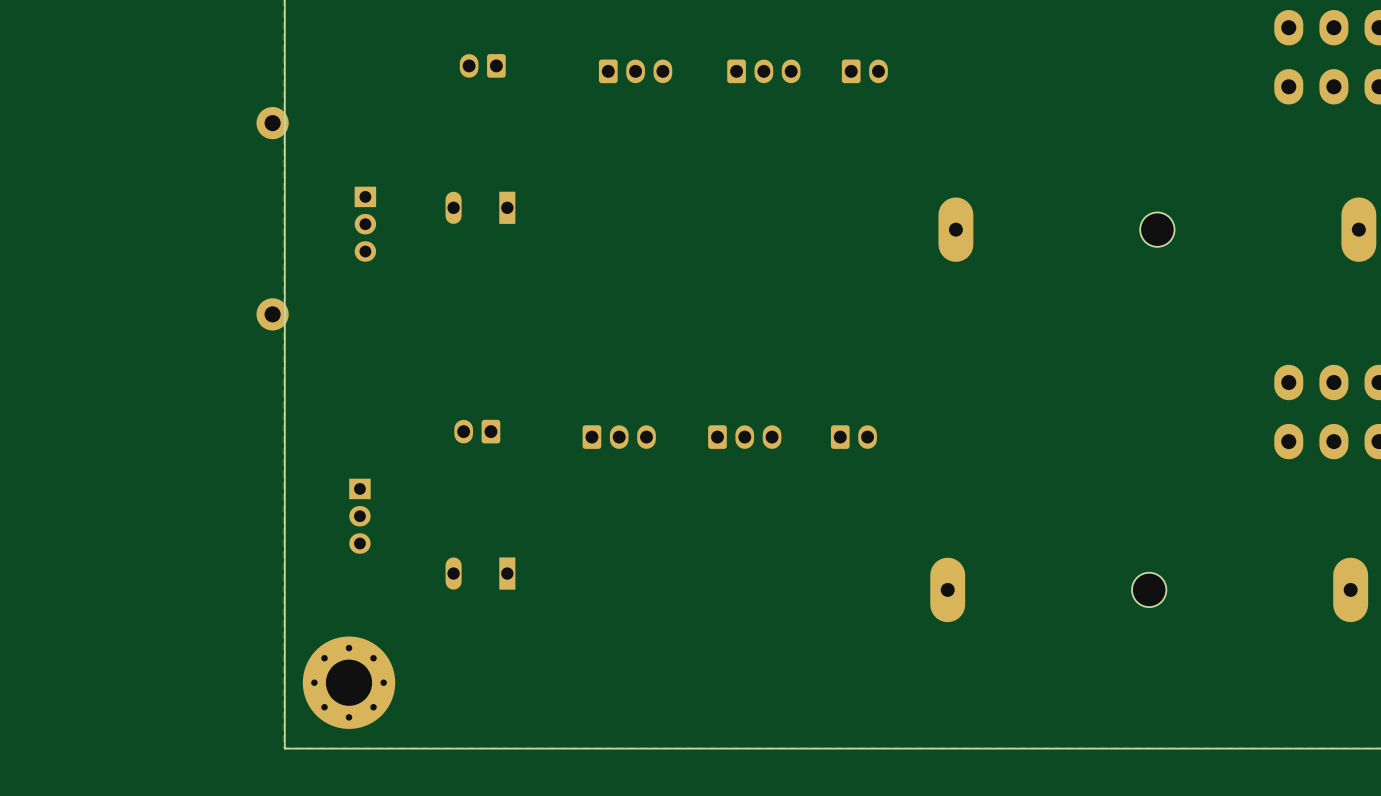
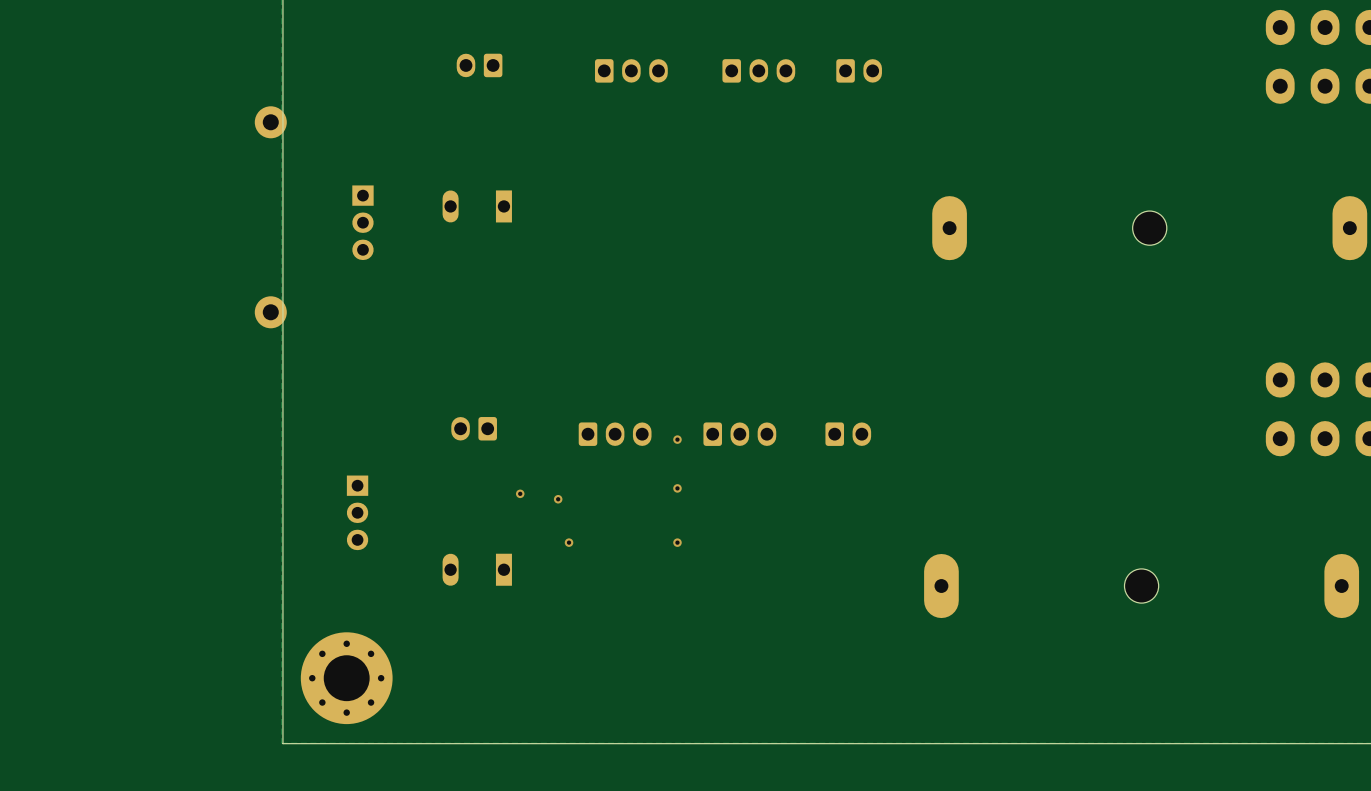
via: none -> (677, 439)
via: none -> (677, 488)
via: none -> (520, 493)
via: none -> (558, 499)
via: none -> (569, 542)
via: none -> (677, 542)

